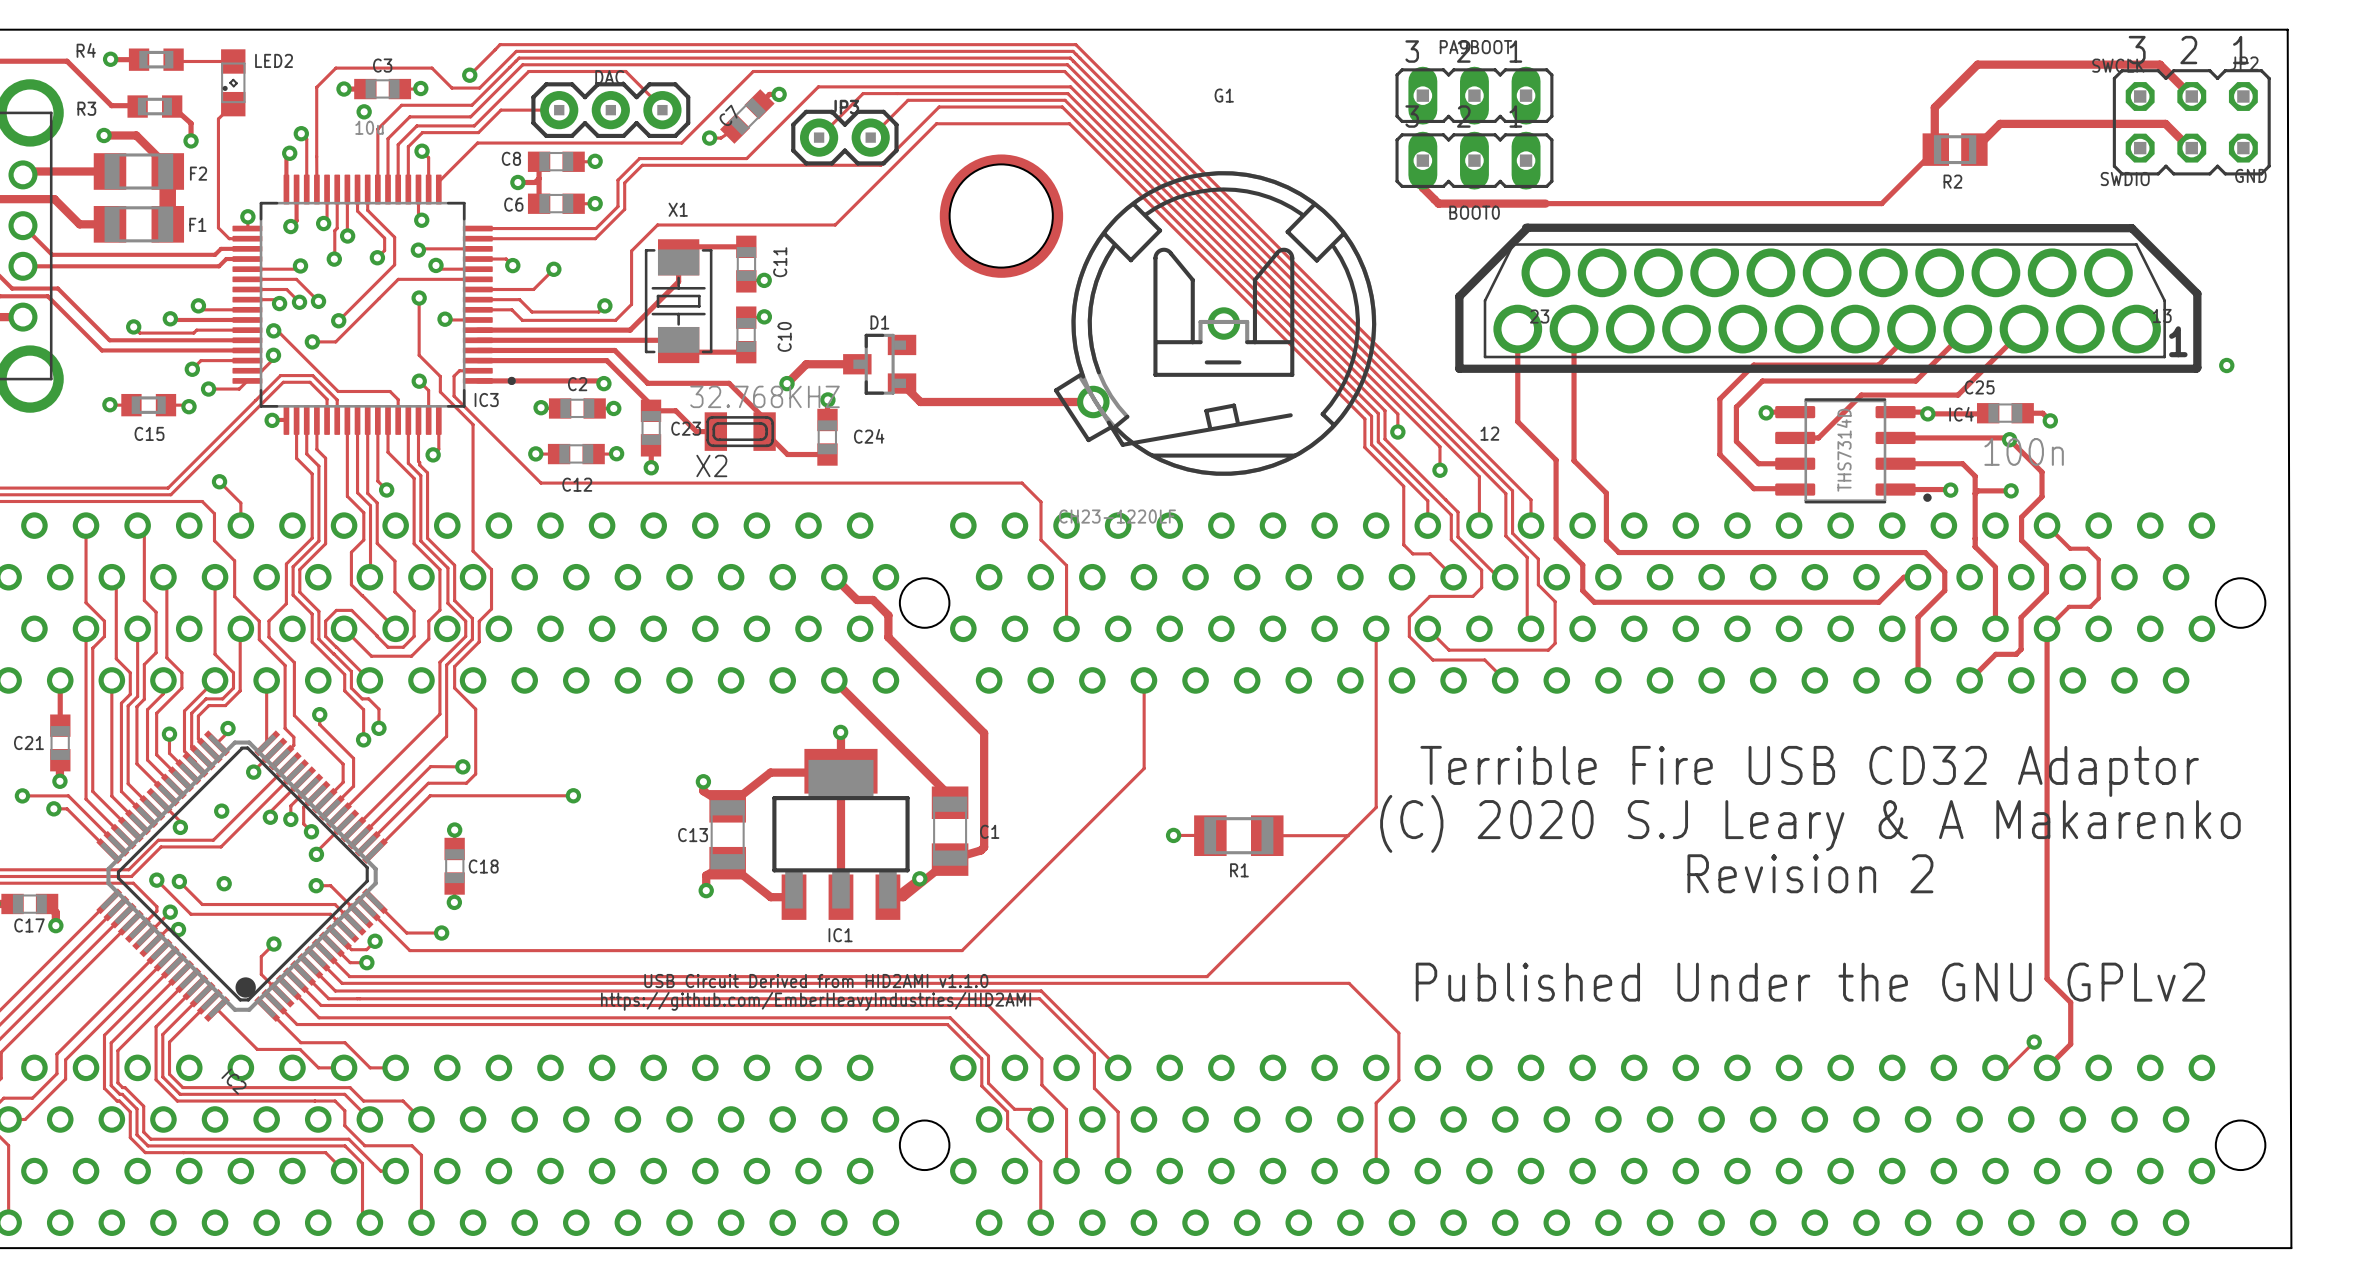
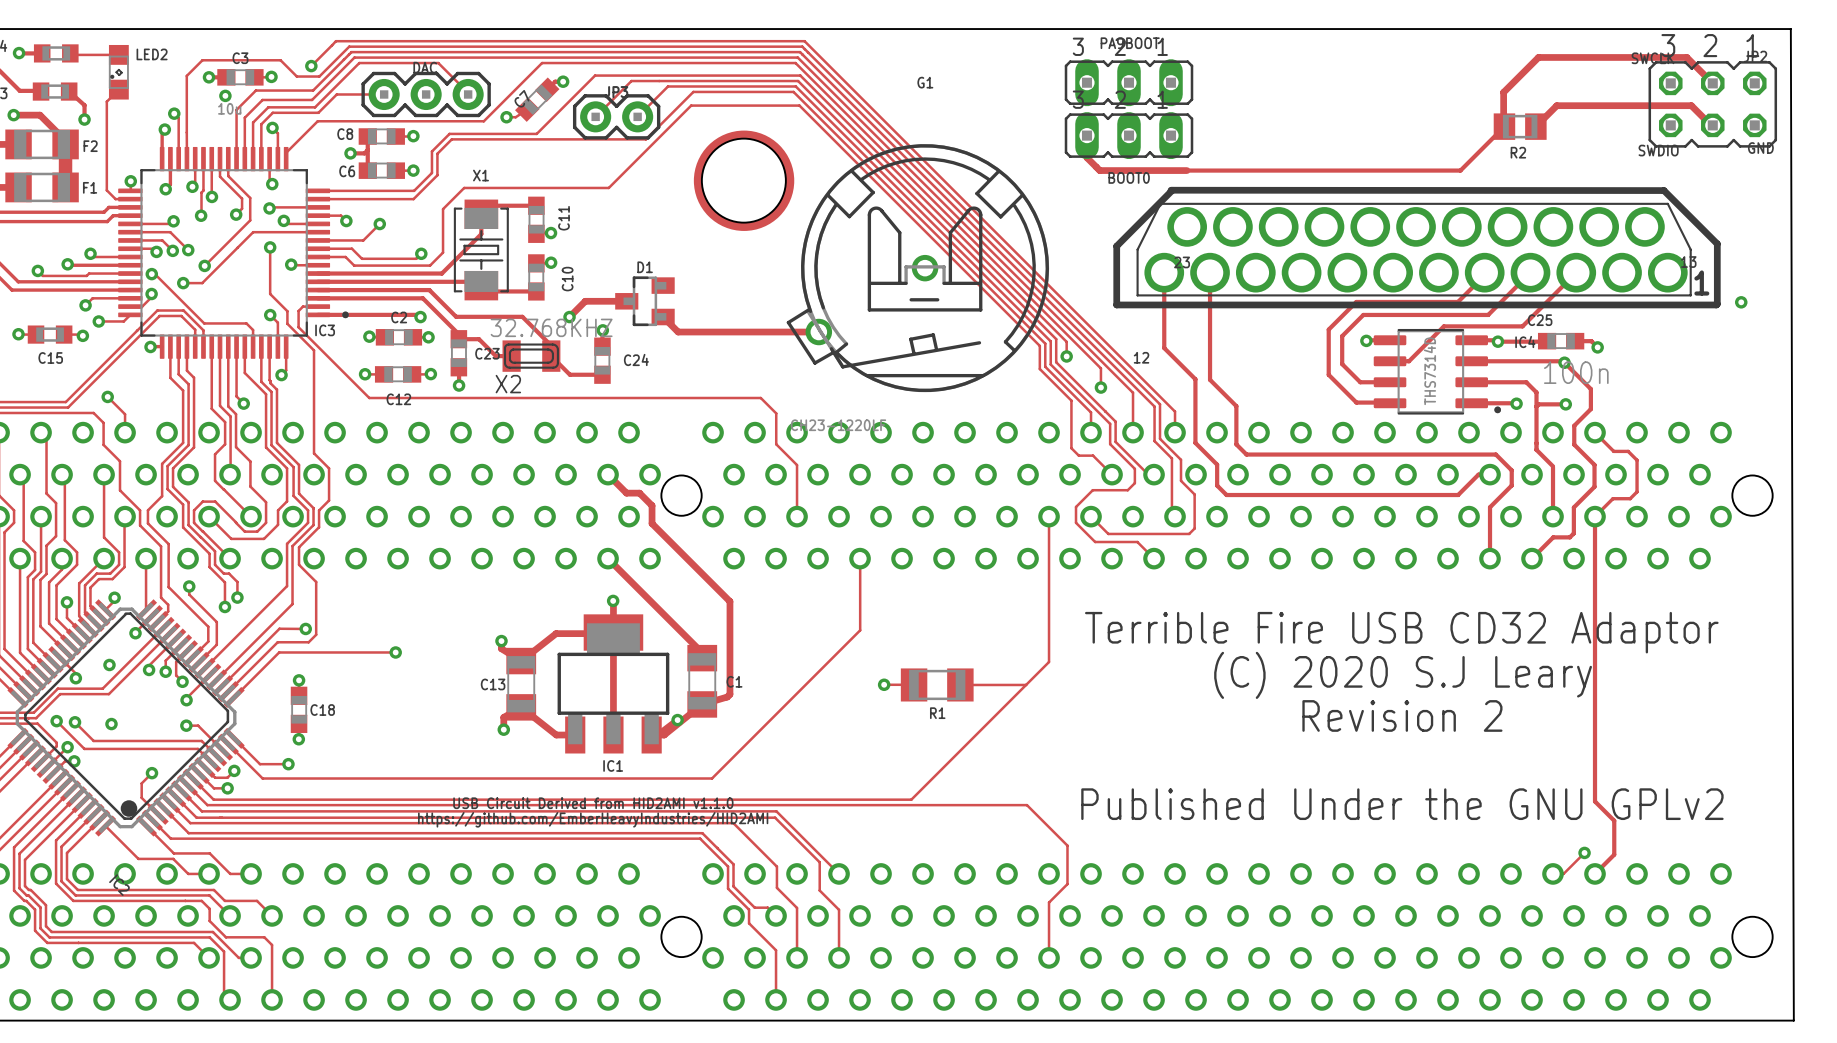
text: (C) 2020 S.J Leary & A Makarenko (1810, 823) -> (C) 2020 S.J Leary (1403, 675)

